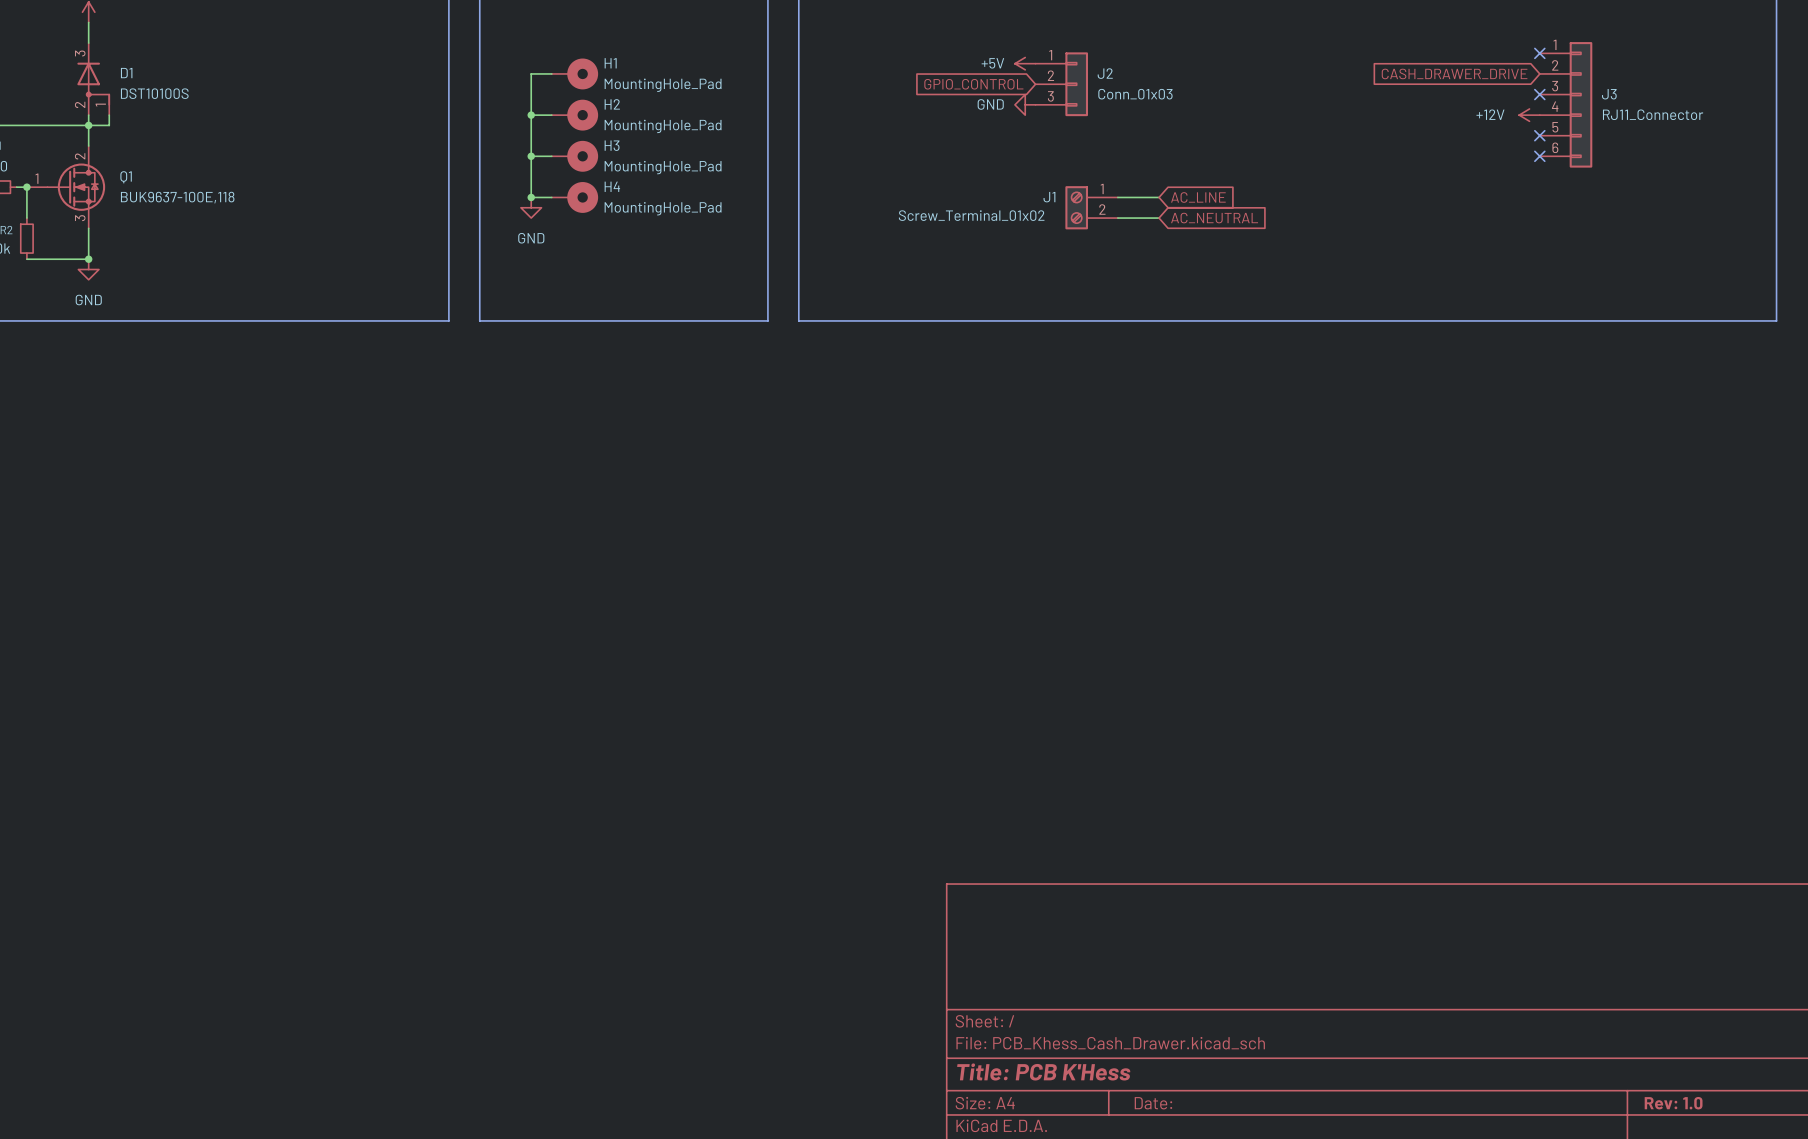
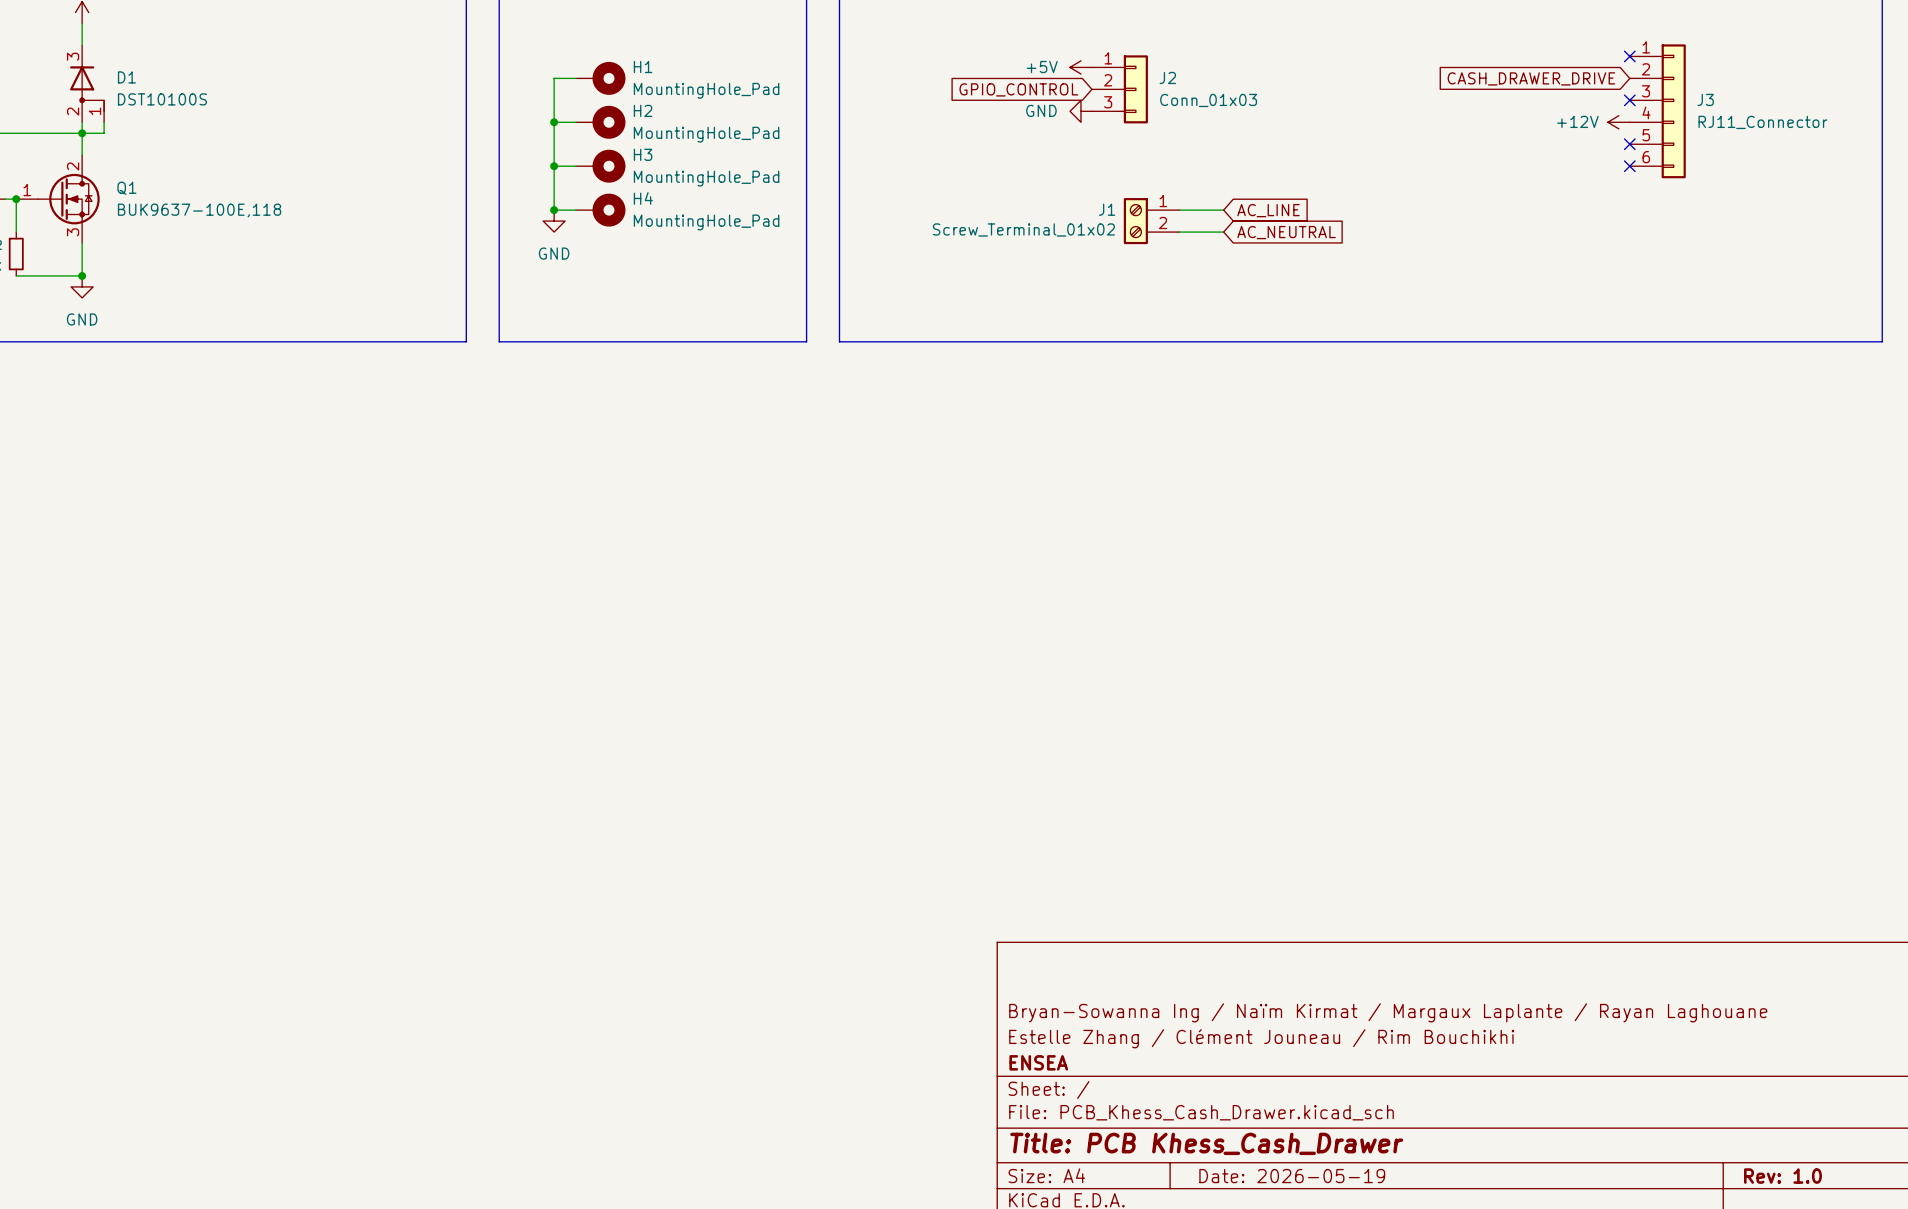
title block: none -> Bryan-Sowanna Ing / Naïm Kirmat / Margaux Laplante / Rayan Laghouane (1388, 1012)
title block: none -> Estelle Zhang / Clément Jouneau / Rim Bouchikhi (1261, 1038)
title block: none -> ENSEA (1038, 1062)
title block: Title: PCB K'Hess (1043, 1071) -> Title: PCB Khess_Cash_Drawer (1206, 1143)
title block: Date: (1153, 1103) -> Date: 2026-05-19 (1292, 1176)

